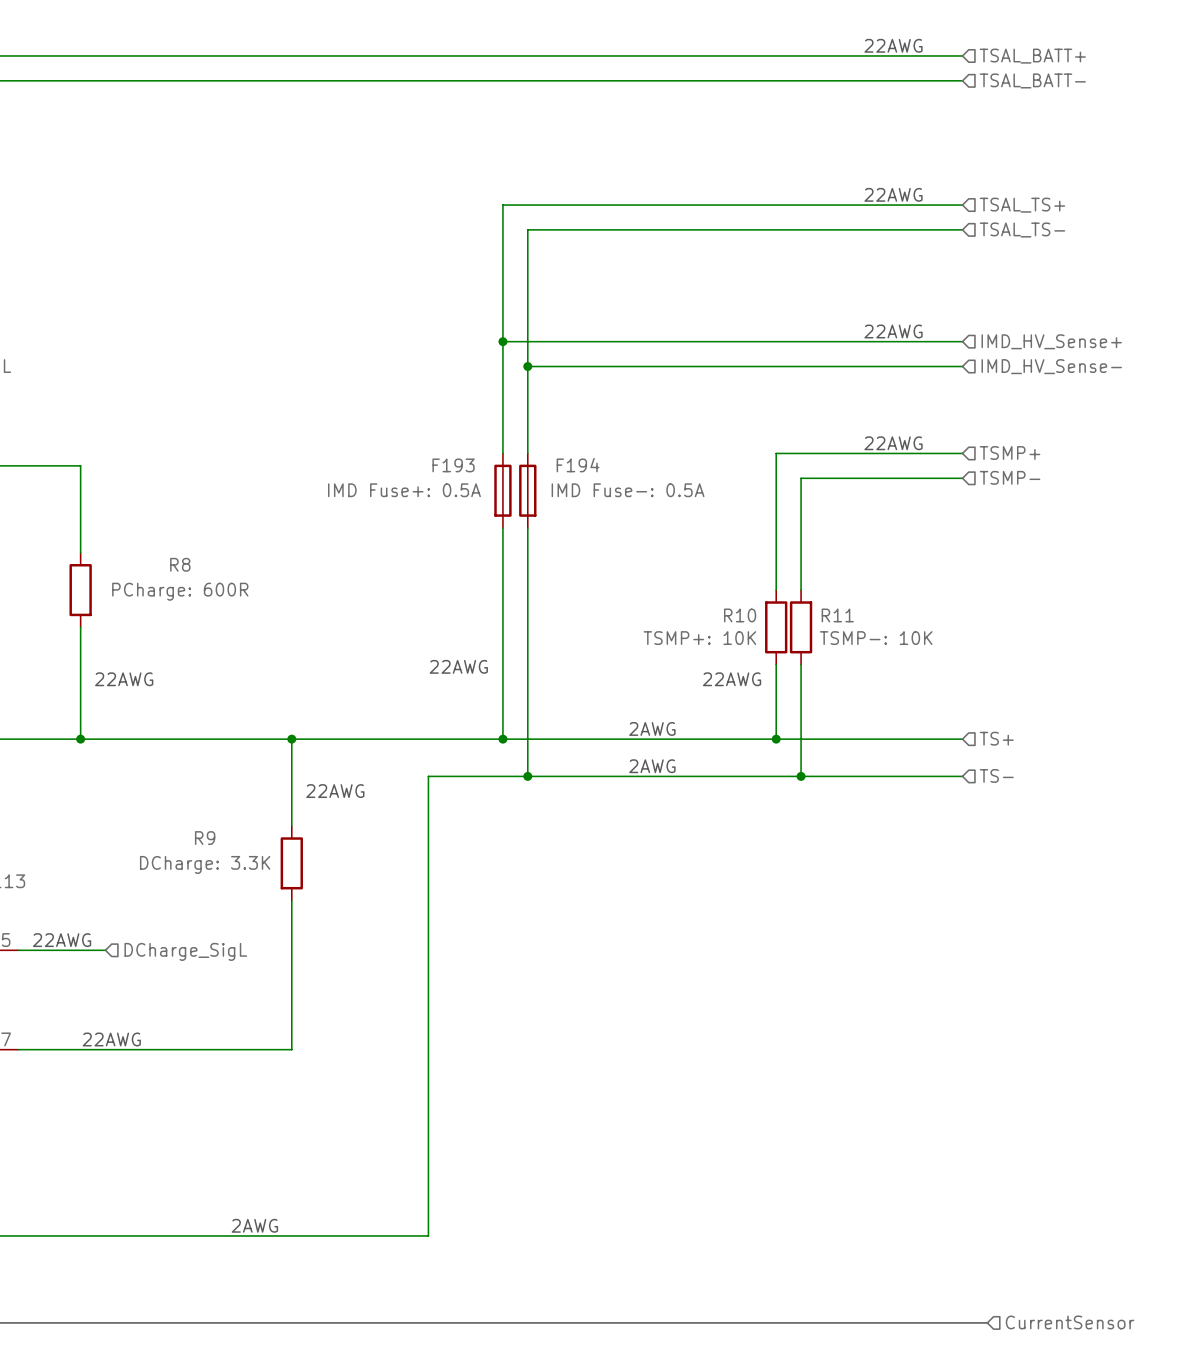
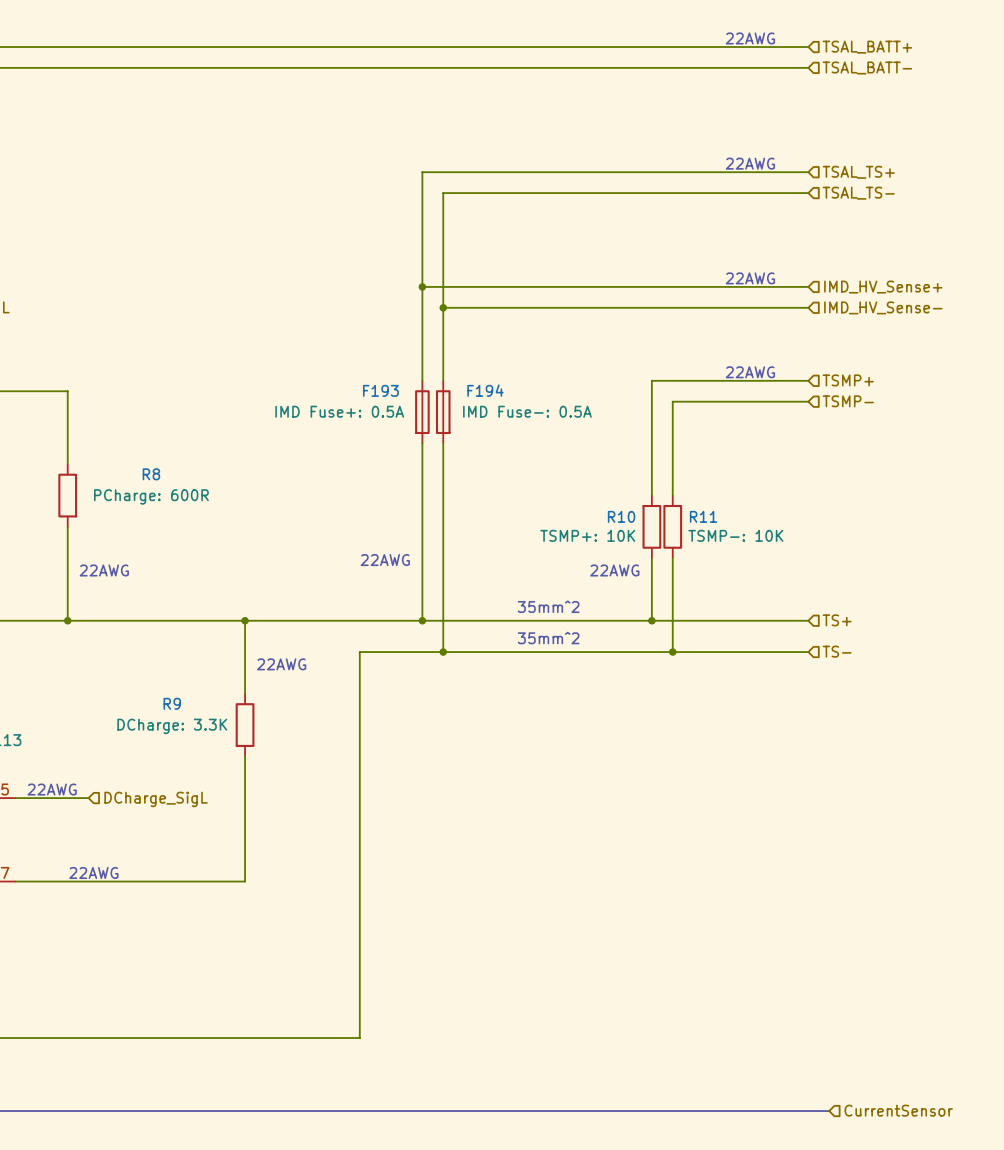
text: none -> 35mm^2 (548, 606)
text: 2AWG (652, 728) -> none
text: none -> 35mm^2 (548, 638)
text: 2AWG (652, 766) -> none
text: 2AWG (254, 1225) -> none

